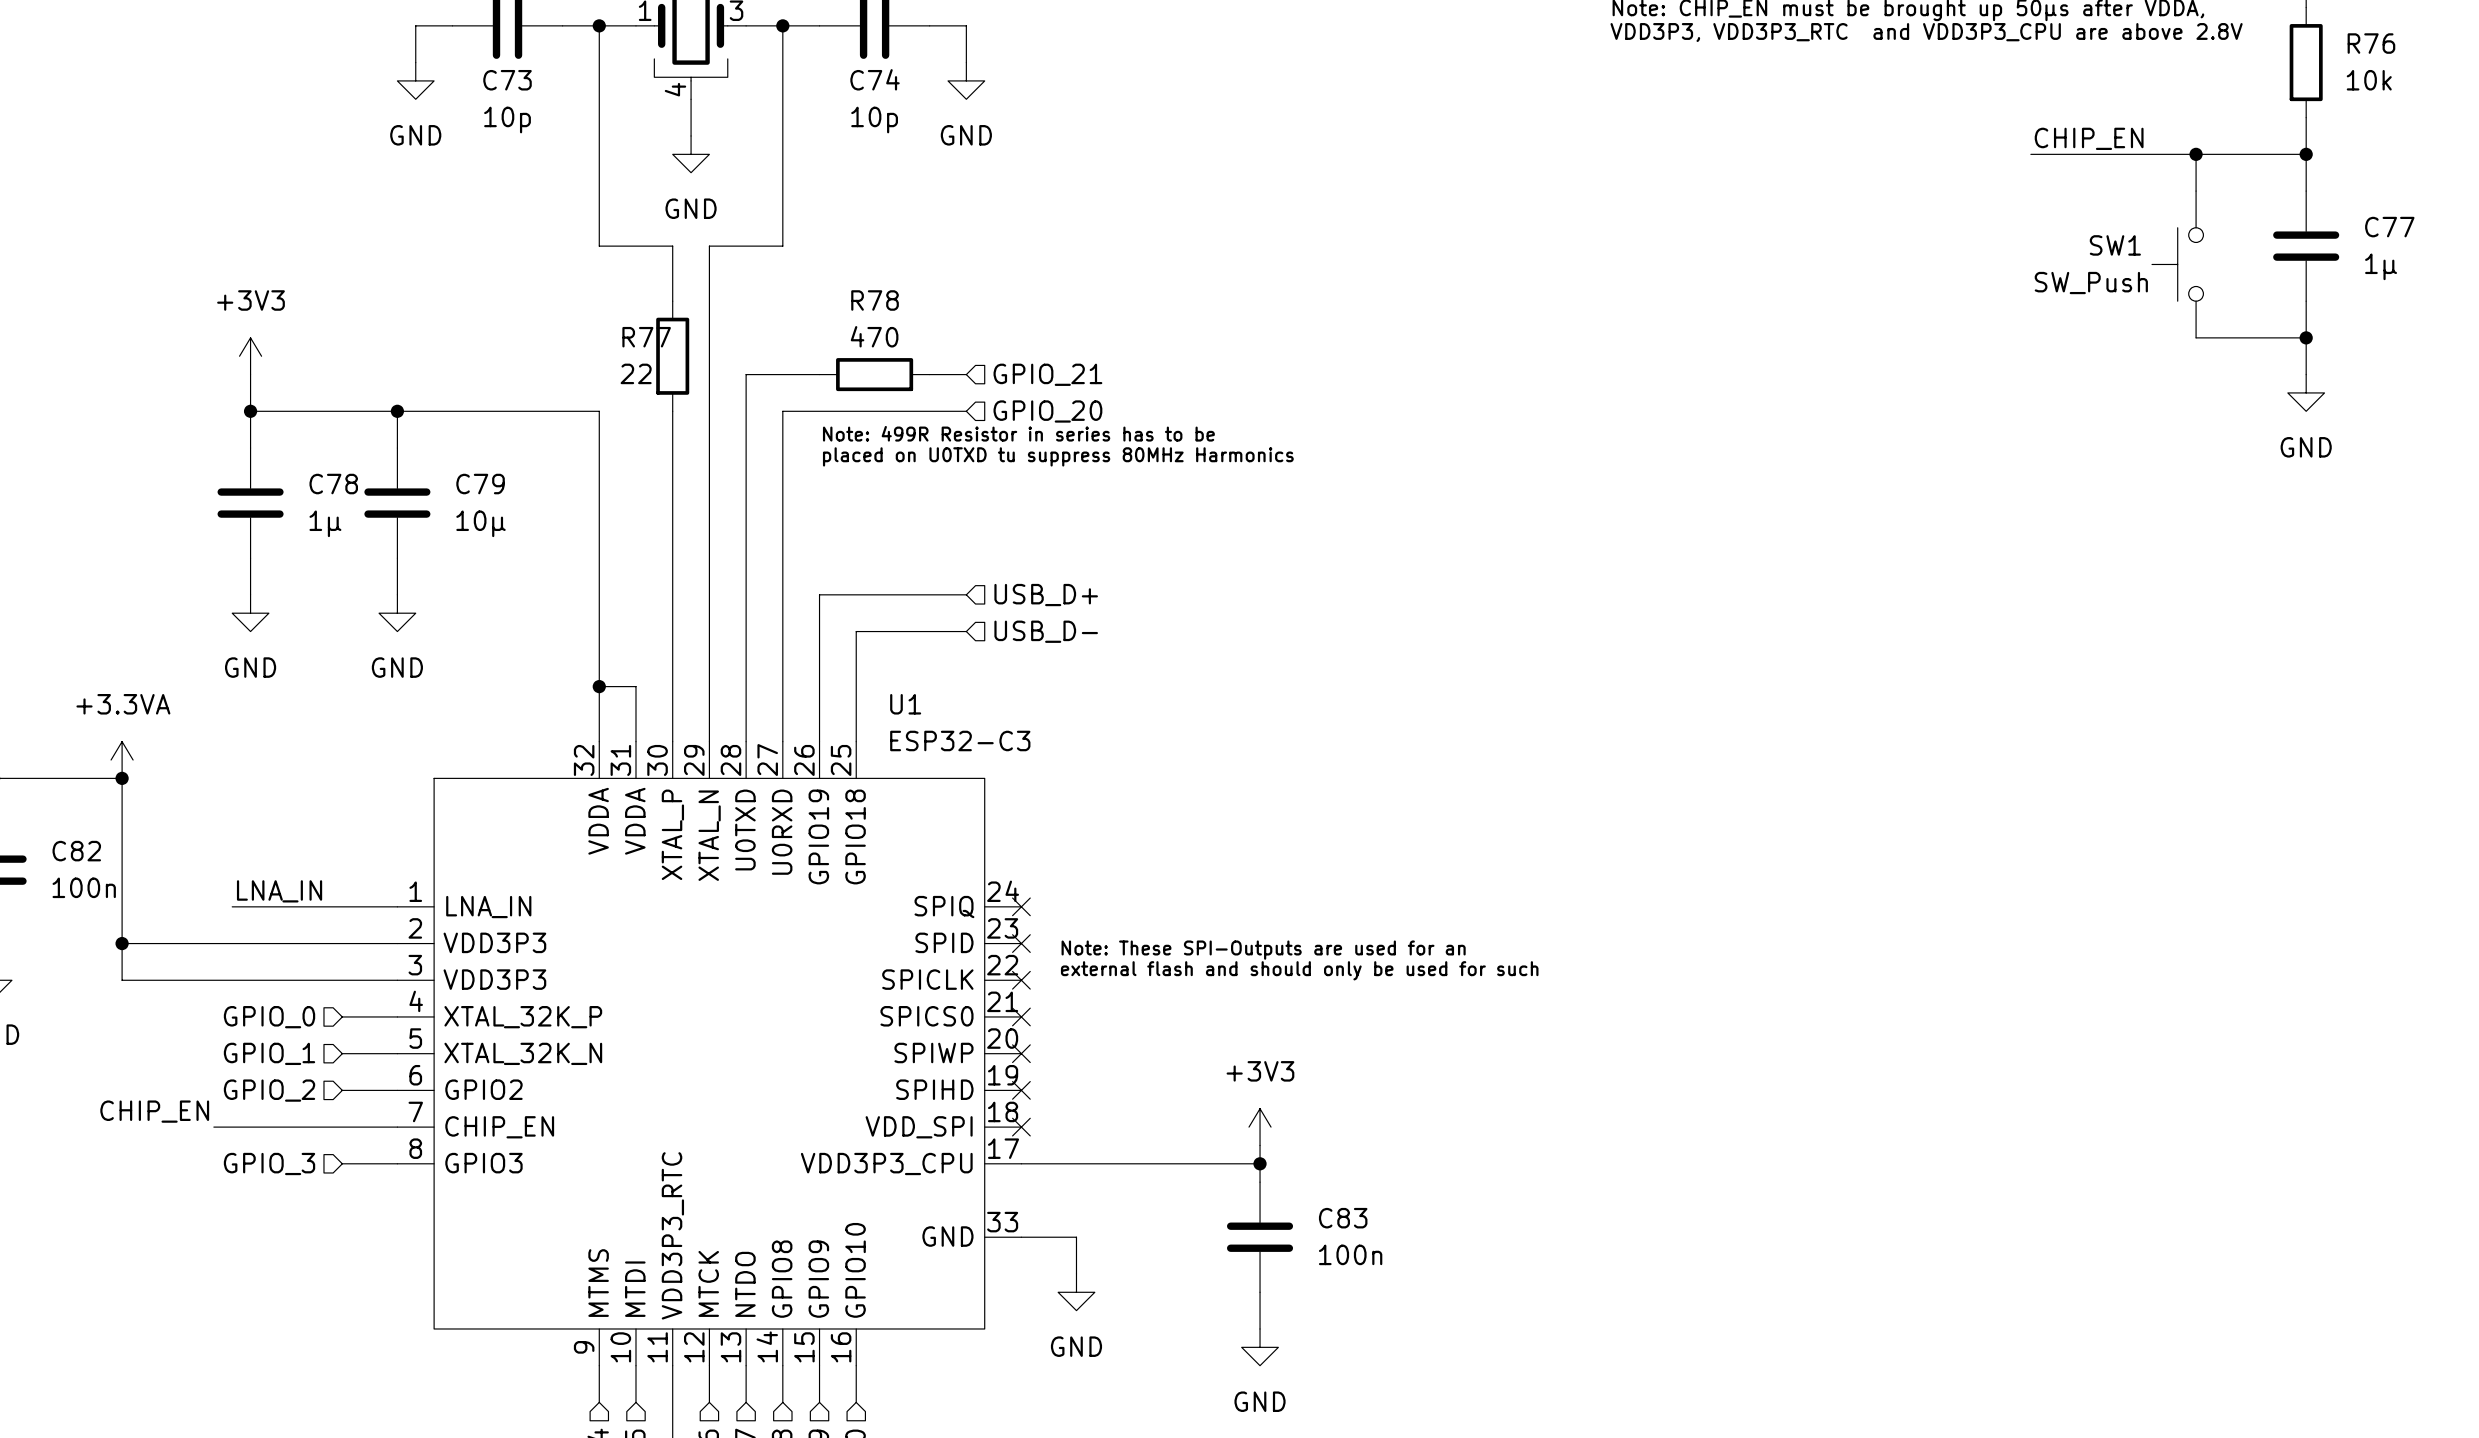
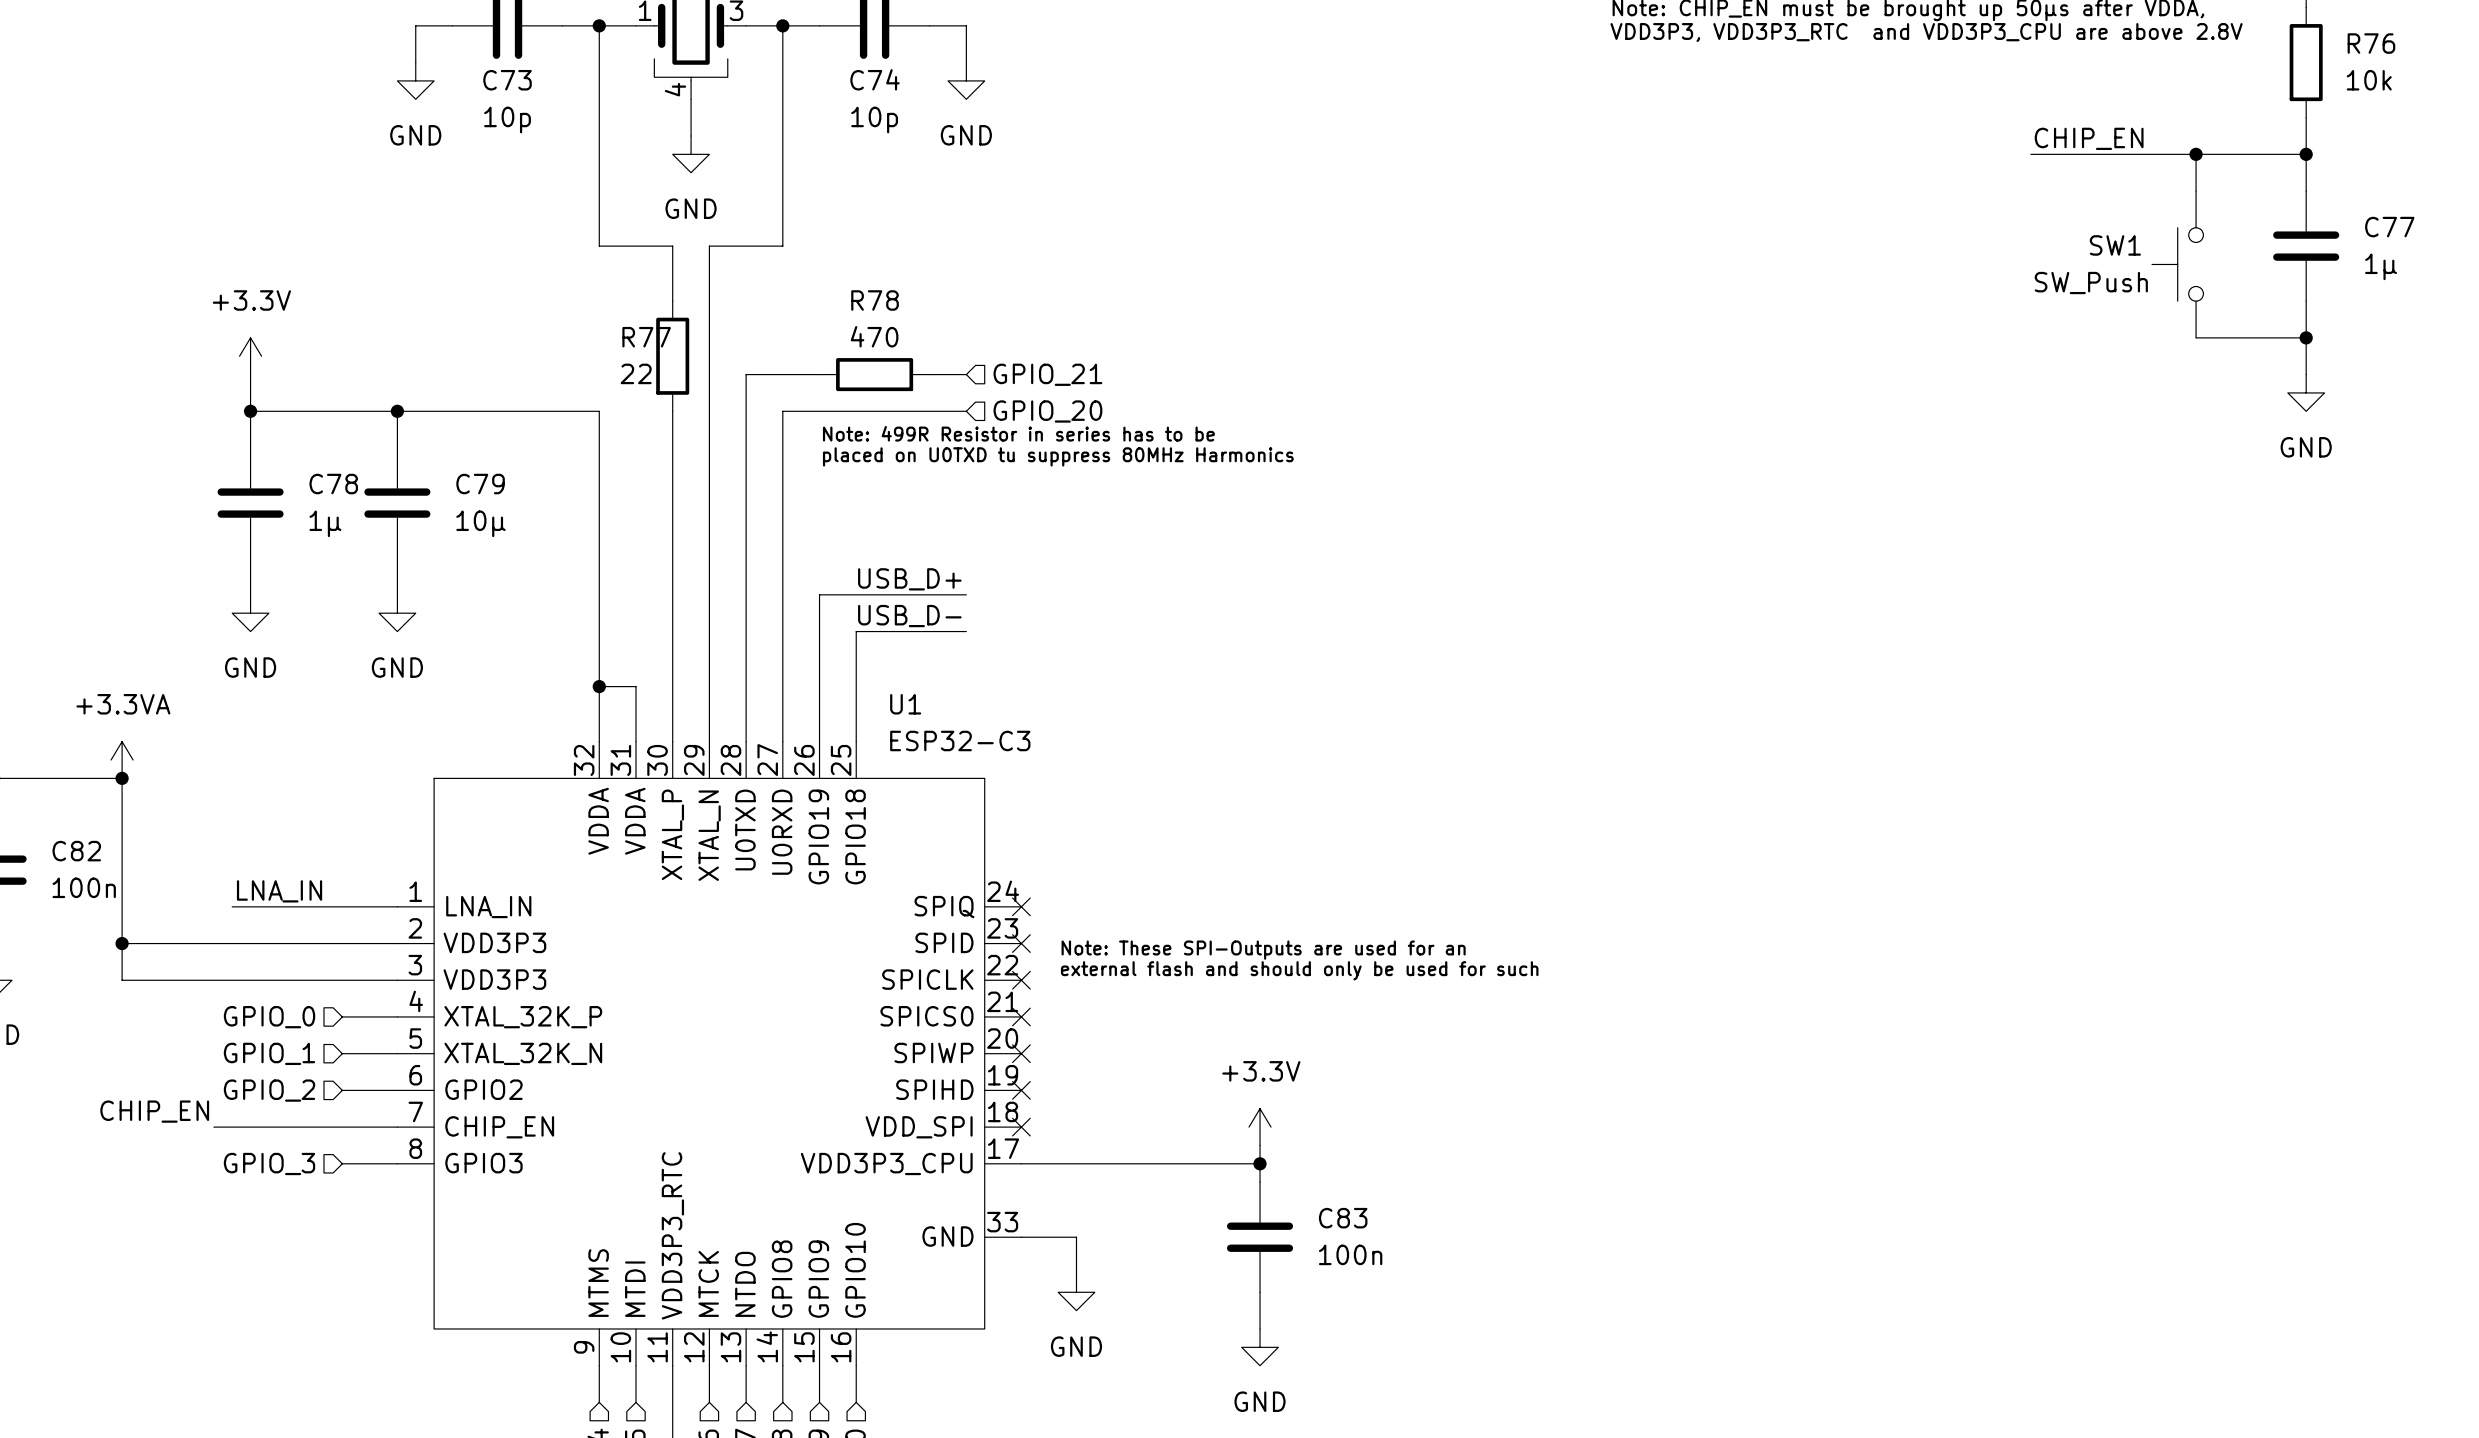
power symbol: +3V3 (250, 356) -> +3.3V (250, 356)
label: none -> USB_D+ (909, 579)
hierarchical label: USB_D+ (1046, 595) -> none
label: none -> USB_D- (909, 616)
hierarchical label: USB_D- (1046, 631) -> none
power symbol: +3V3 (1260, 1127) -> +3.3V (1260, 1127)

